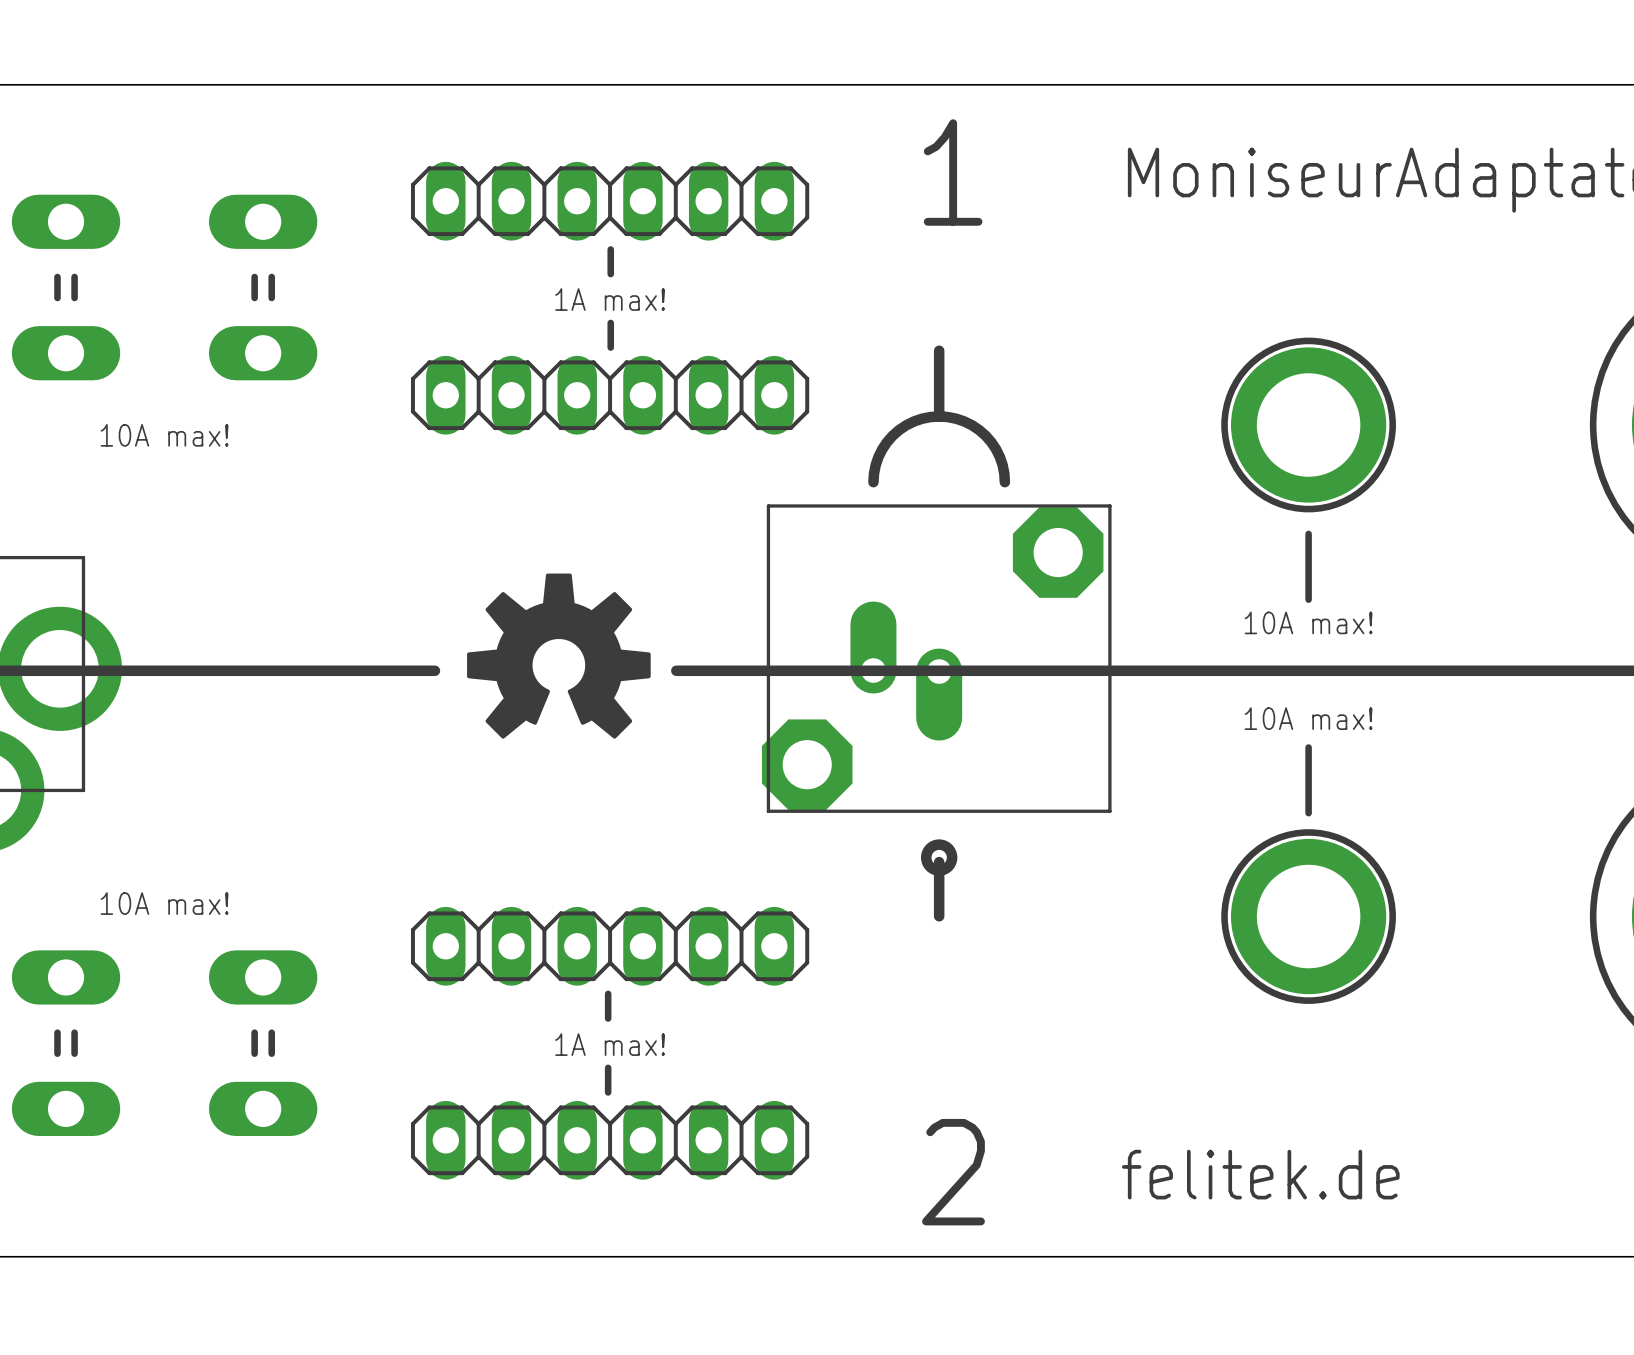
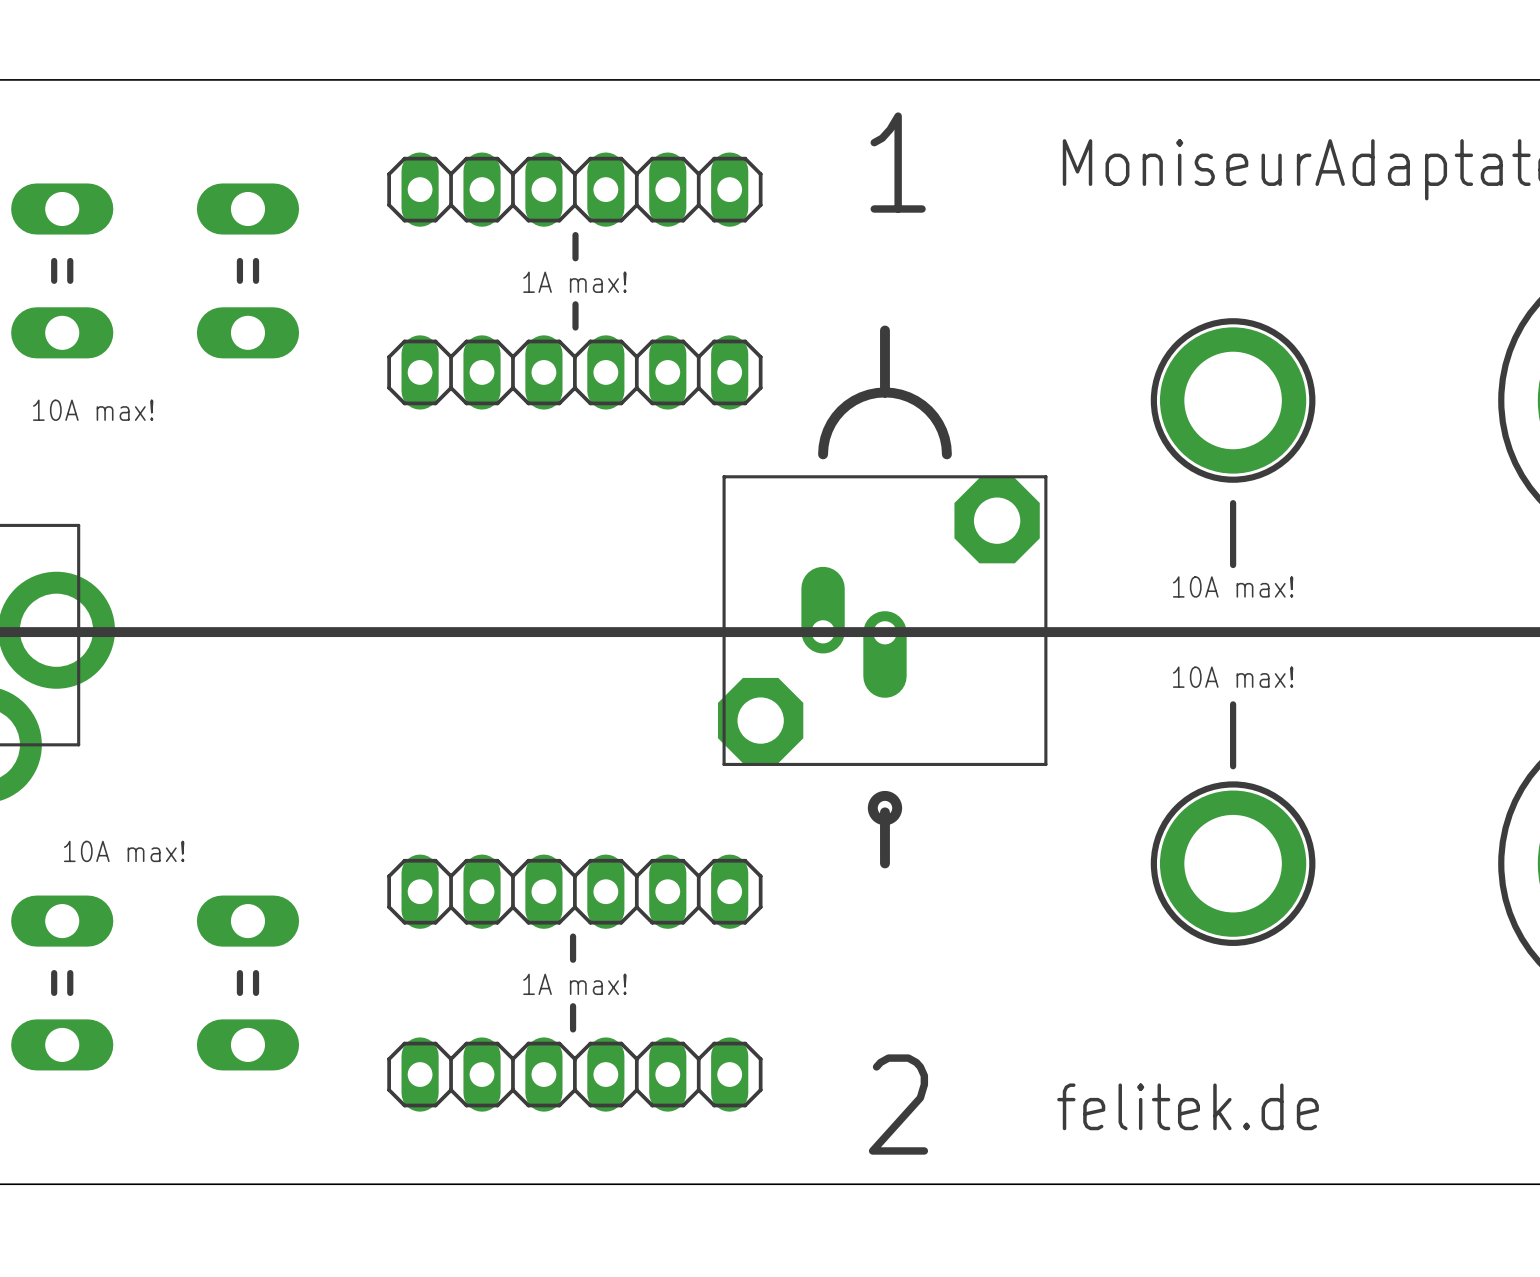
text position: 10A max! (164, 435) -> 10A max! (93, 410)
drawing: [467, 573, 651, 739] -> none
line: none -> (409, 632) (637, 632)
text position: 10A max! (164, 903) -> 10A max! (124, 851)

